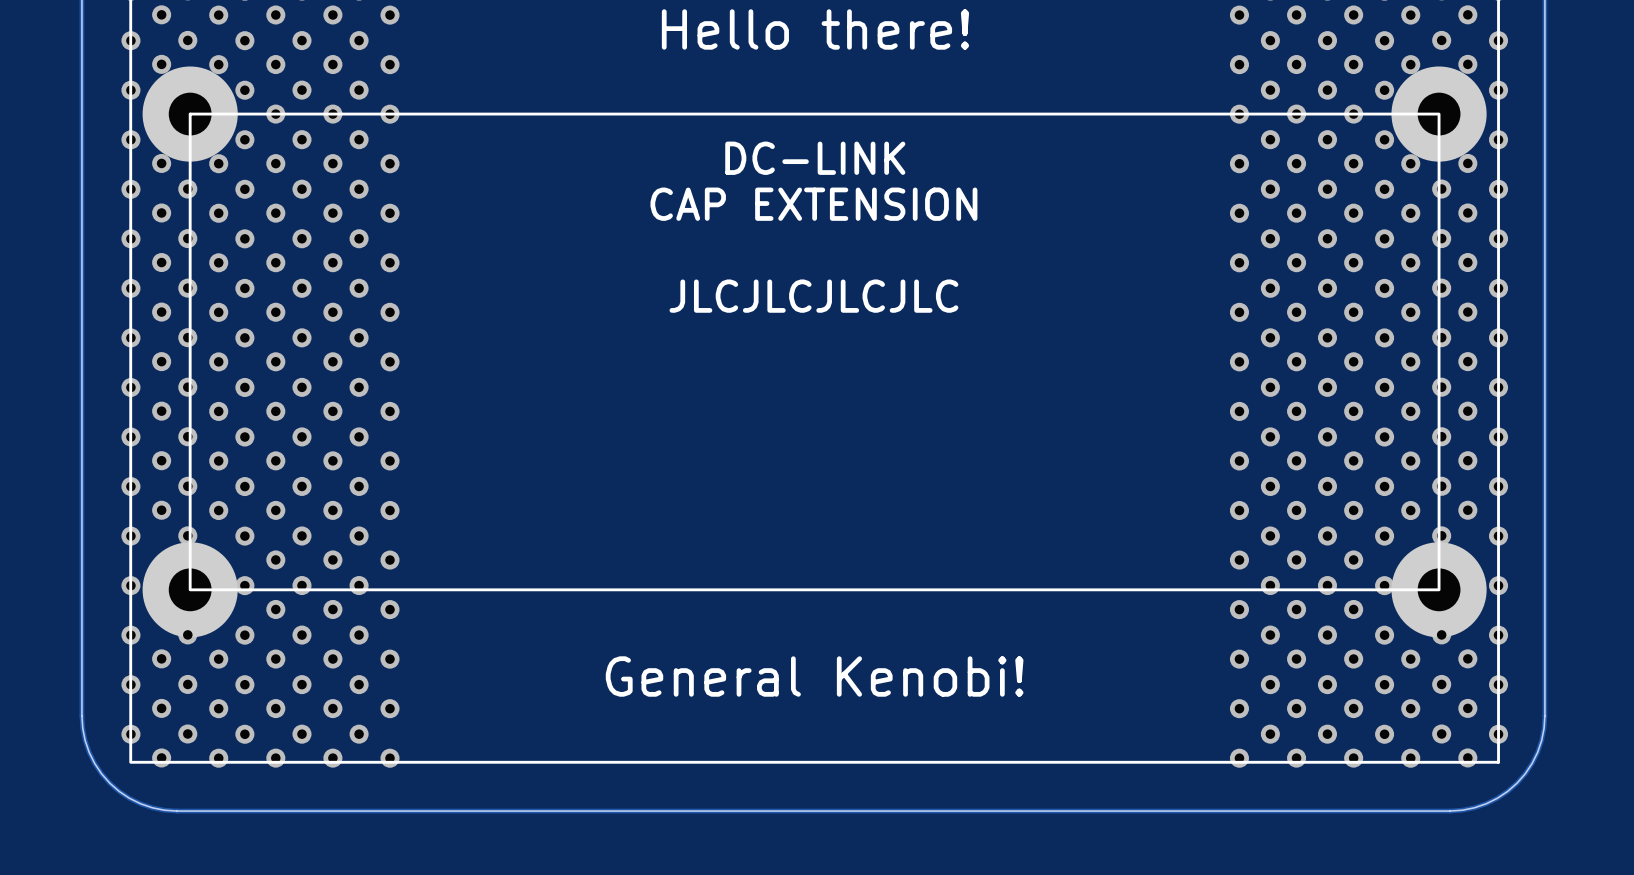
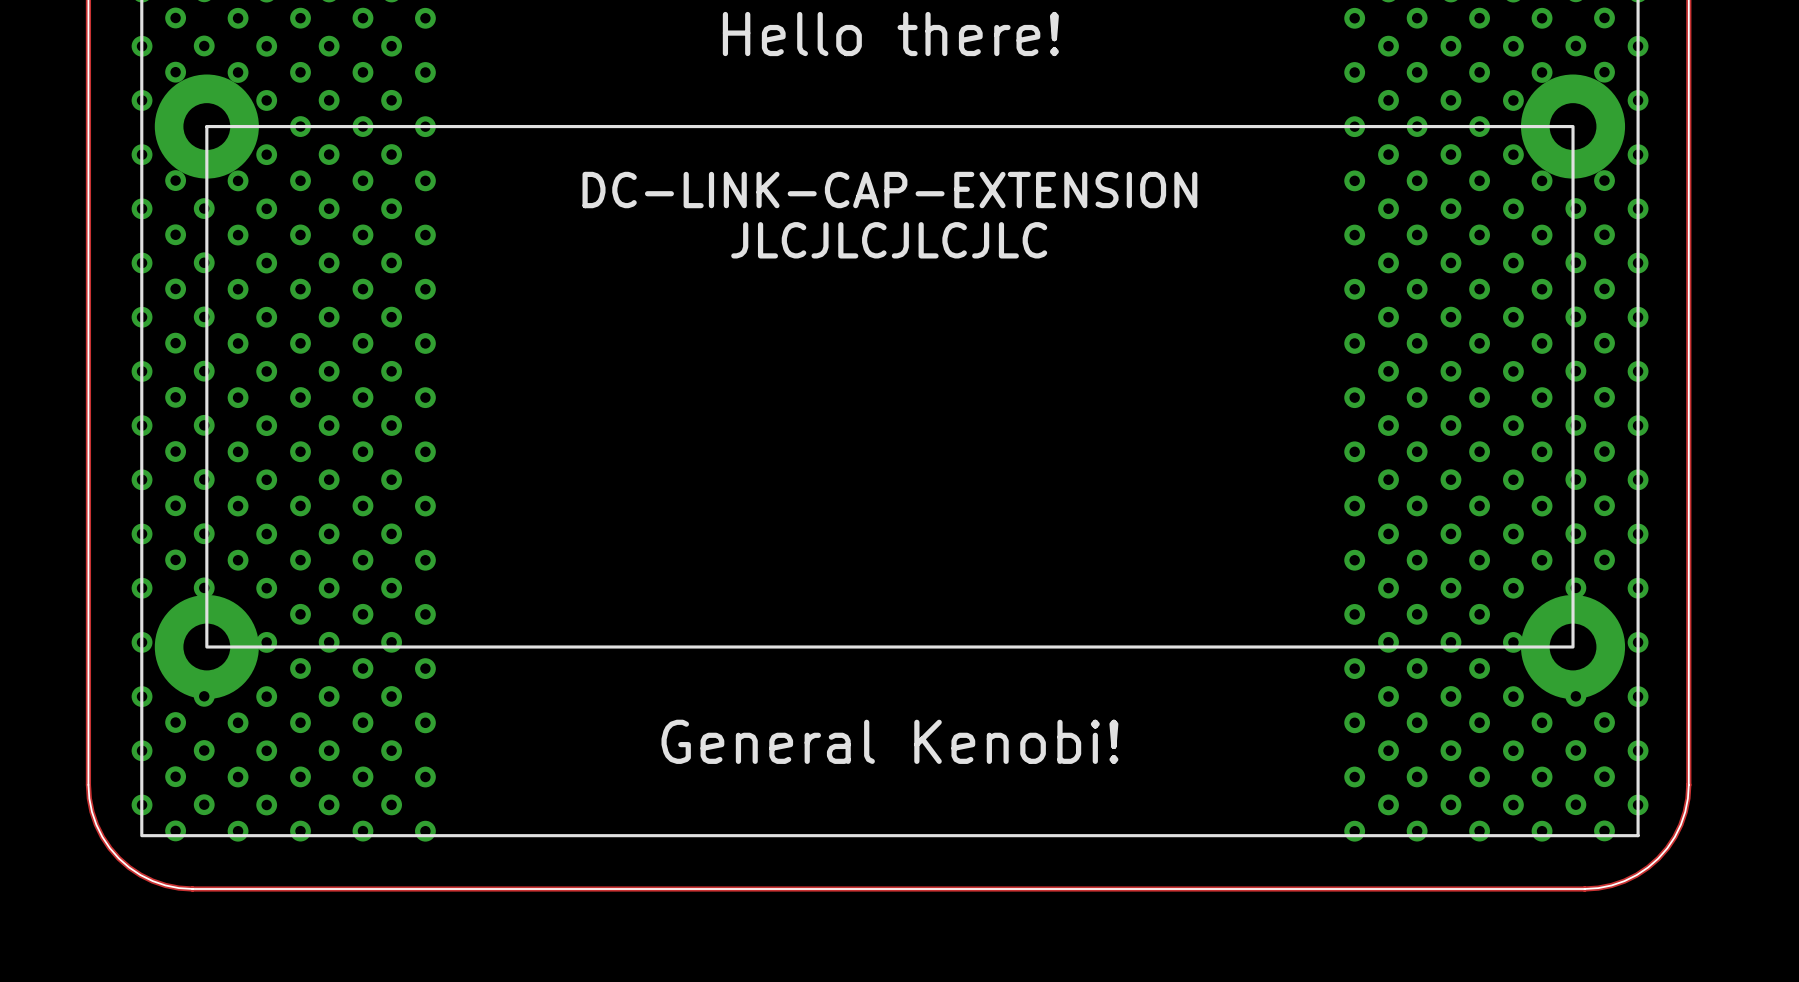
text: DC-LINK (815, 158) -> DC-LINK-CAP-EXTENSION (889, 190)
text: CAP EXTENSION (813, 204) -> none
text position: JLCJLCJLCJLC (813, 296) -> JLCJLCJLCJLC (889, 240)

